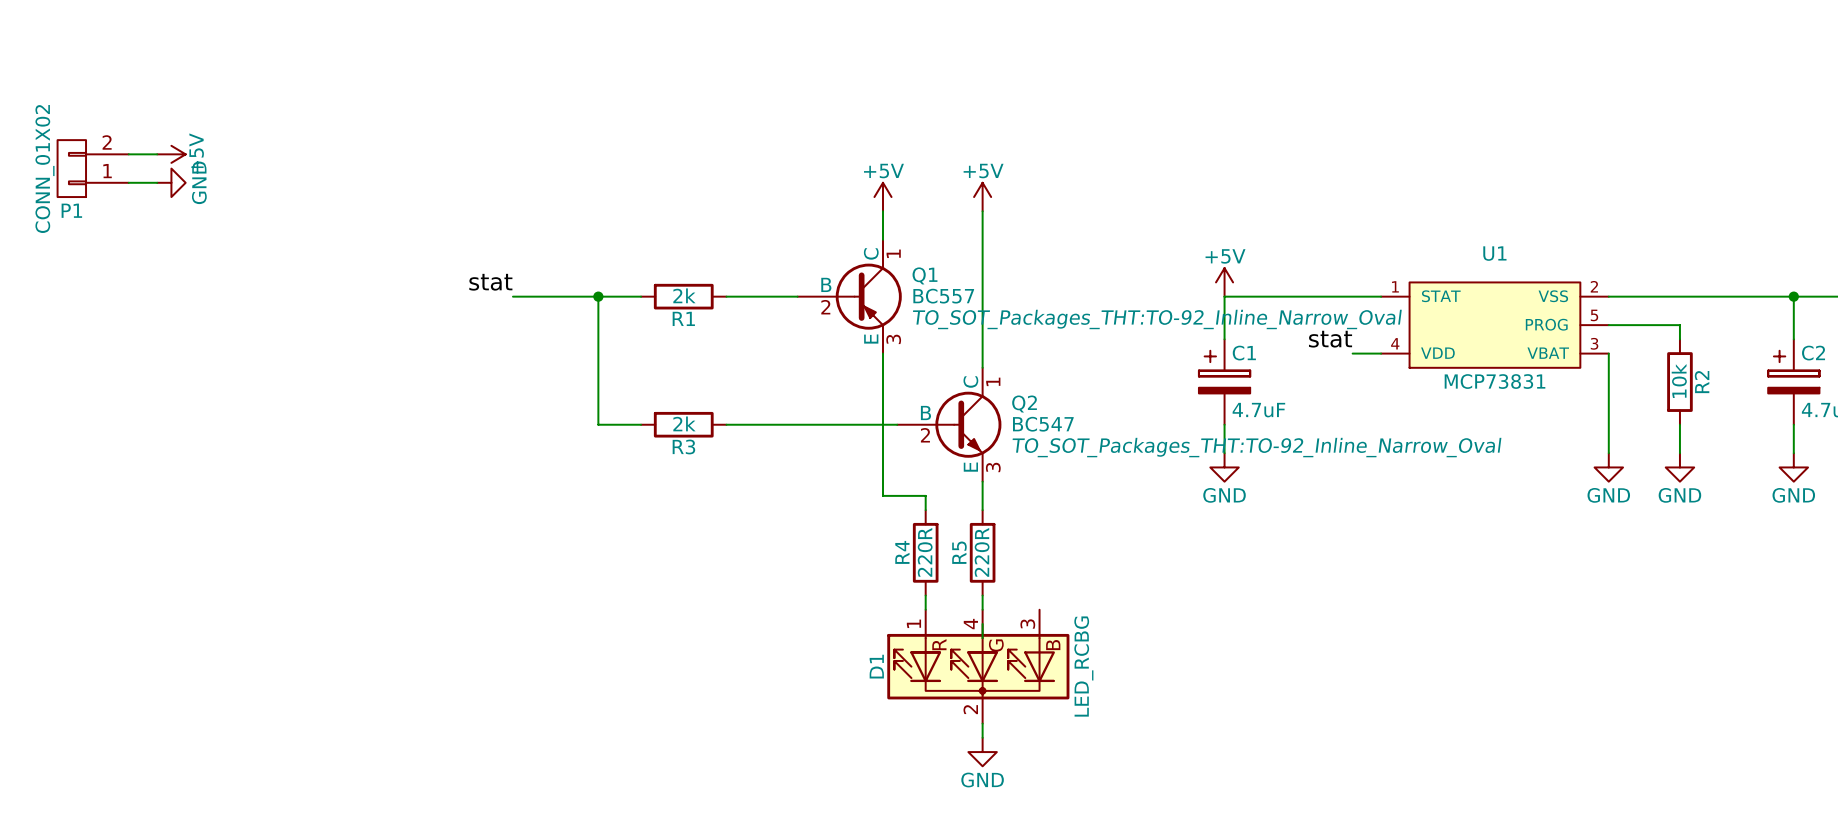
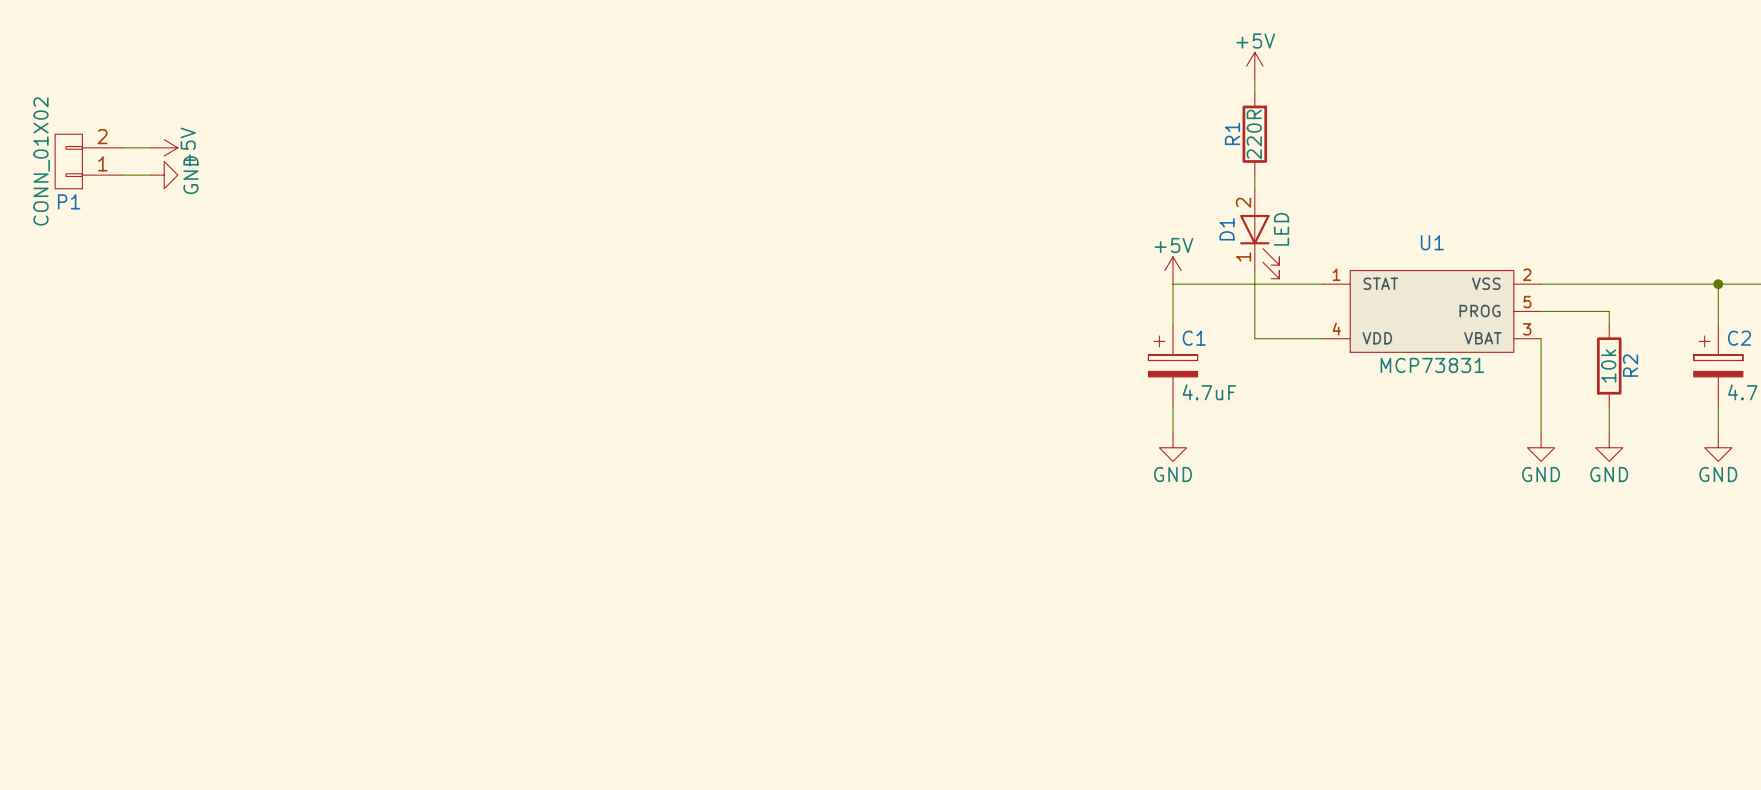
power symbol: none -> +5V (1254, 66)
wire: none -> (1254, 79) (1254, 93)
wire: none -> (1254, 175) (1254, 188)
power symbol: +5V (883, 197) -> none
power symbol: +5V (982, 197) -> none
wire: (883, 211) (883, 239) -> none
wire: (982, 211) (982, 367) -> none
label: stat (490, 282) -> none
wire: none -> (1254, 270) (1254, 338) (1295, 338)
R1 value: 2k (684, 295) -> 220R (1254, 134)
wire: (512, 296) (641, 296) -> none
wire: (598, 296) (598, 424) (641, 424) -> none
junction: (598, 296) -> none
R1 rotation: 0° (683, 296) -> 90° clockwise (1254, 134)
R1 position: (683, 296) -> (1254, 134)
wire: (726, 296) (797, 296) -> none
Q1: BC557 (849, 296) -> none
label: stat (1330, 339) -> none
wire: (883, 353) (883, 495) (925, 495) (925, 510) -> none
R3: 2k (683, 424) -> none
wire: (726, 424) (897, 424) -> none
Q2: BC547 (949, 424) -> none
wire: (982, 481) (982, 510) -> none
R4: 220R (925, 552) -> none
R5: 220R (982, 552) -> none
wire: (925, 595) (925, 609) -> none
wire: (982, 595) (982, 609) -> none
D1 symbol: [887, 609, 1070, 724] -> [1240, 188, 1280, 279]
wire: (982, 623) (982, 638) -> none
D1 name position: D1 (876, 666) -> D1 (1227, 229)
D1 value: LED_RCBG (1083, 666) -> LED (1281, 229)
wire: (982, 723) (982, 737) -> none
power symbol: GND (982, 752) -> none

